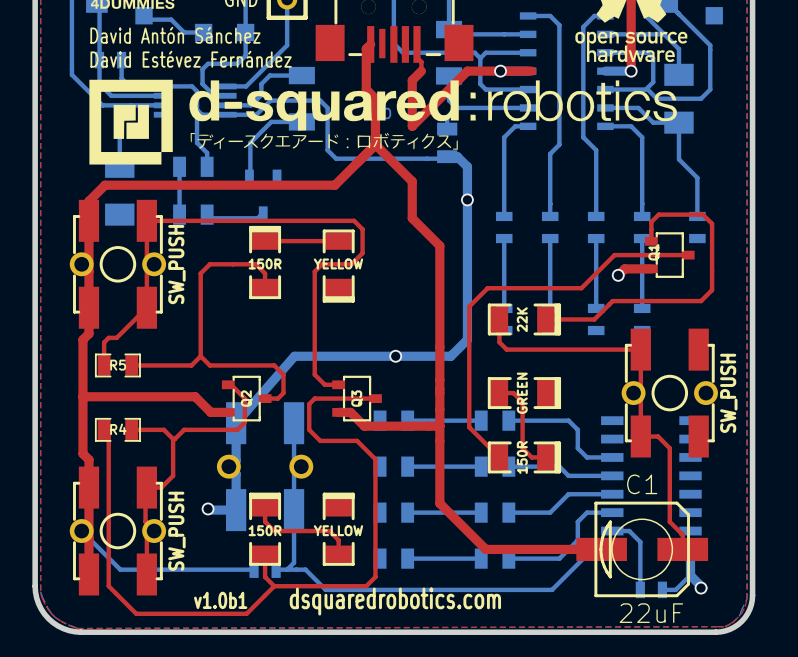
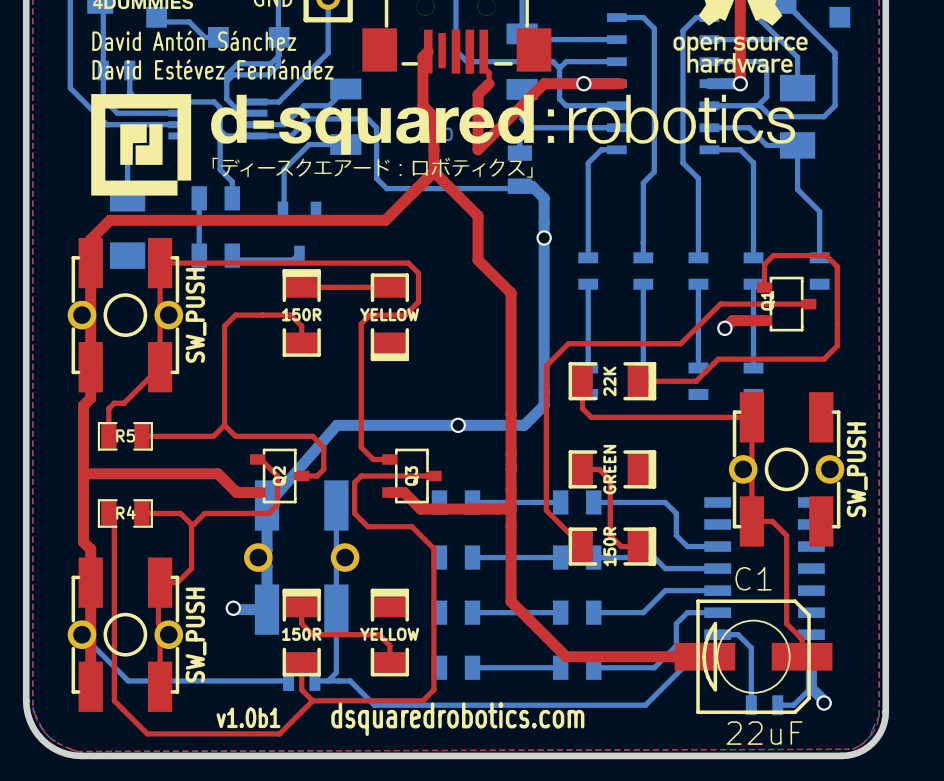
part footprint: [194, 23, 255, 42] -> [208, 27, 290, 48]
bottom track: none -> (279, 37) (279, 55) (270, 63) (237, 63) (226, 74) (226, 81)
bottom track: (301, 75) (269, 75) (261, 84) (261, 95) -> (345, 88) (329, 105) (303, 105) (297, 112)

